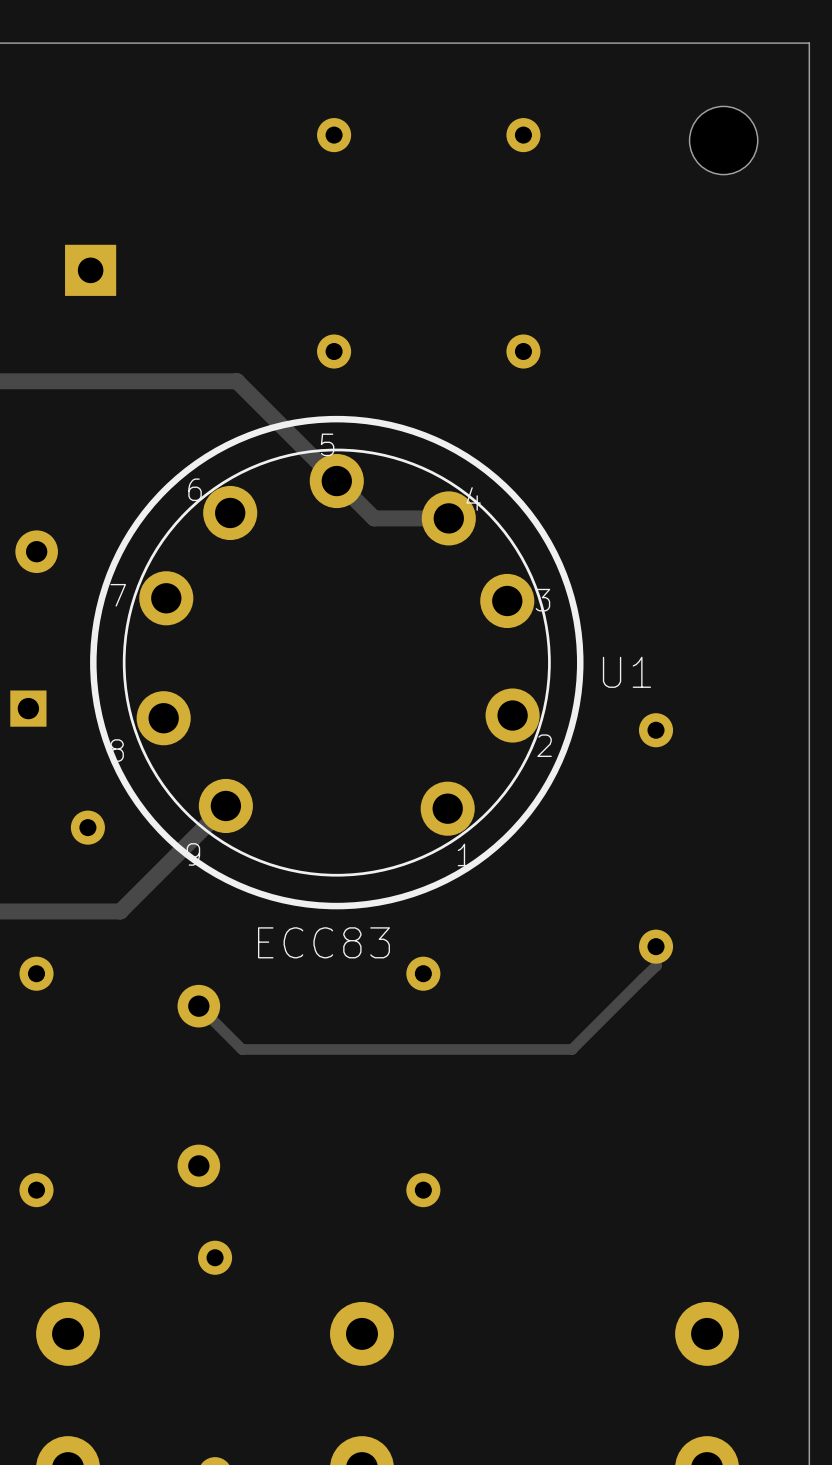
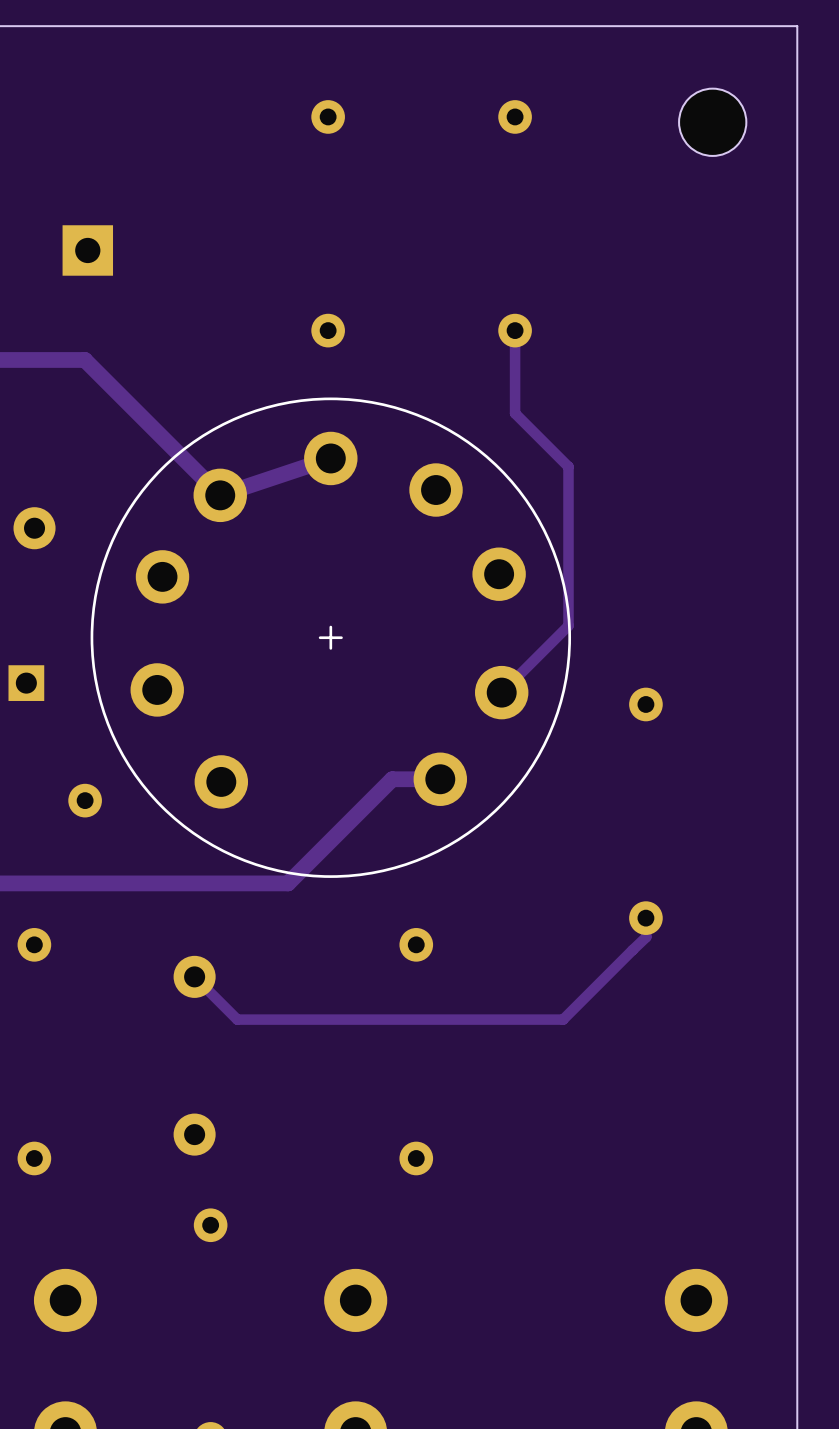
track: none -> (515, 330) (515, 413) (568, 466) (568, 625) (501, 692)
track: (87, 381) (237, 381) (374, 518) (448, 518) -> (84, 359) (220, 495) (330, 458)
U1 side: bottom (336, 662) -> top (330, 637)
track: (225, 805) (120, 911) -> (440, 779) (392, 779) (288, 883) (117, 883)

